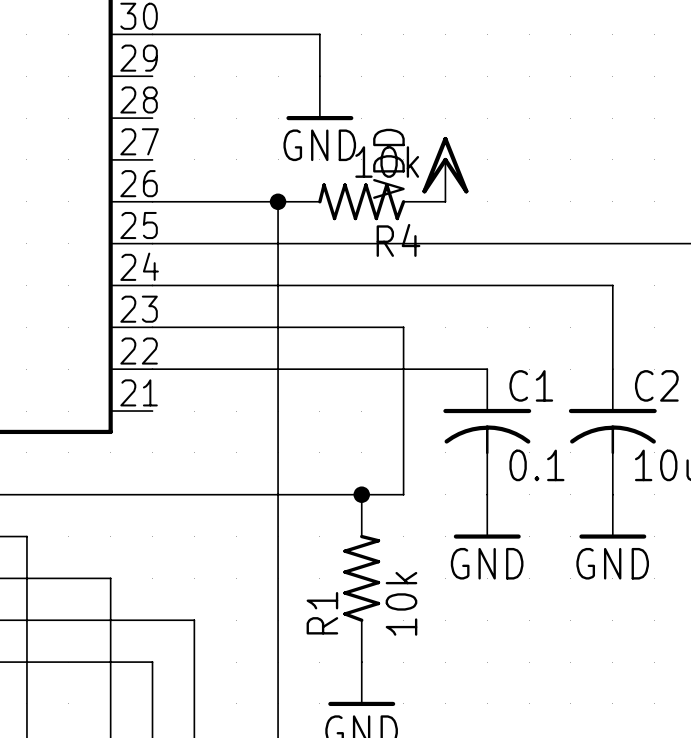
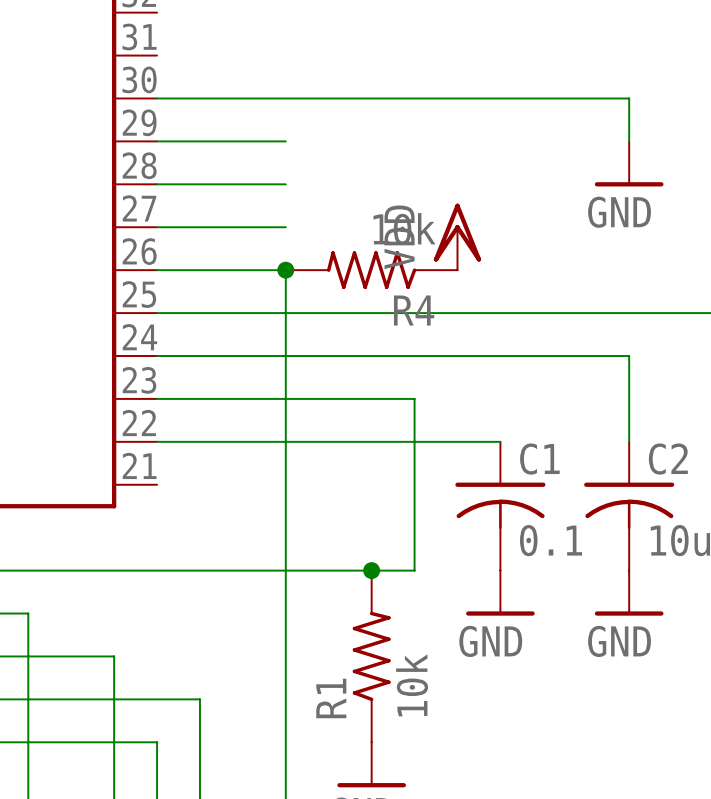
wire: (319, 34) (319, 76) -> (328, 98) (629, 98) (629, 141)
wire: none -> (157, 141) (285, 141)
power symbol position: GND (319, 98) -> GND (629, 163)
wire: none -> (157, 184) (285, 184)
wire: none -> (157, 227) (285, 227)

